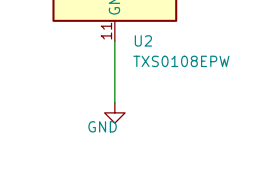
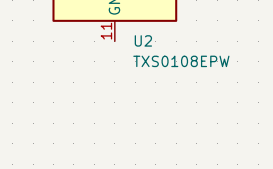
wire: (114, 41) (114, 102) -> none
power symbol: GND (114, 112) -> none

